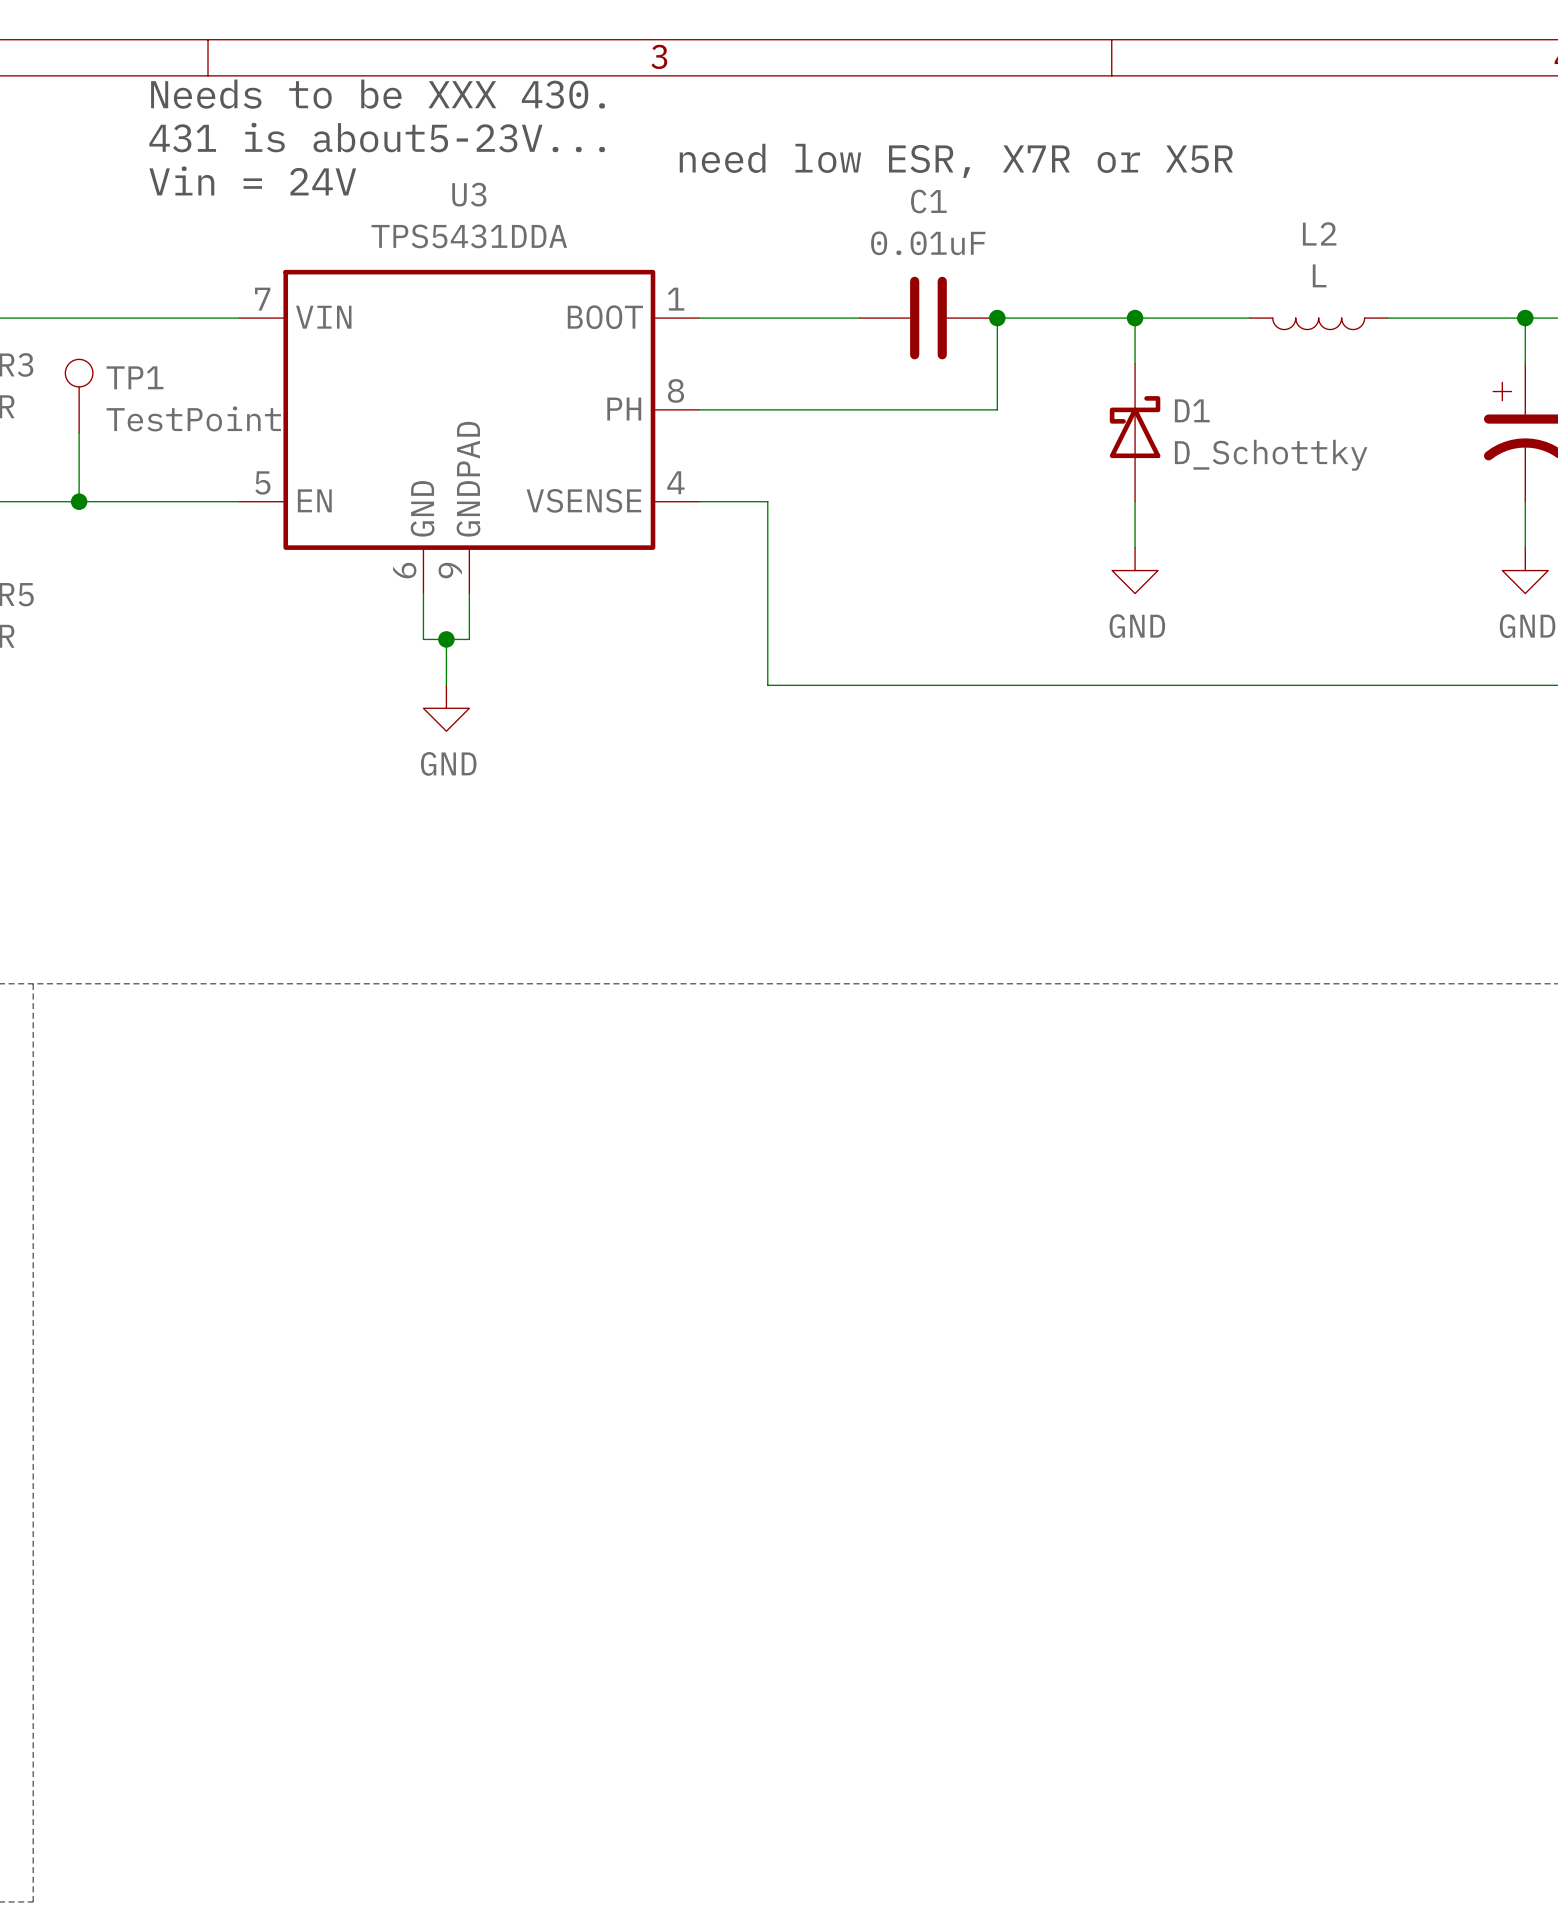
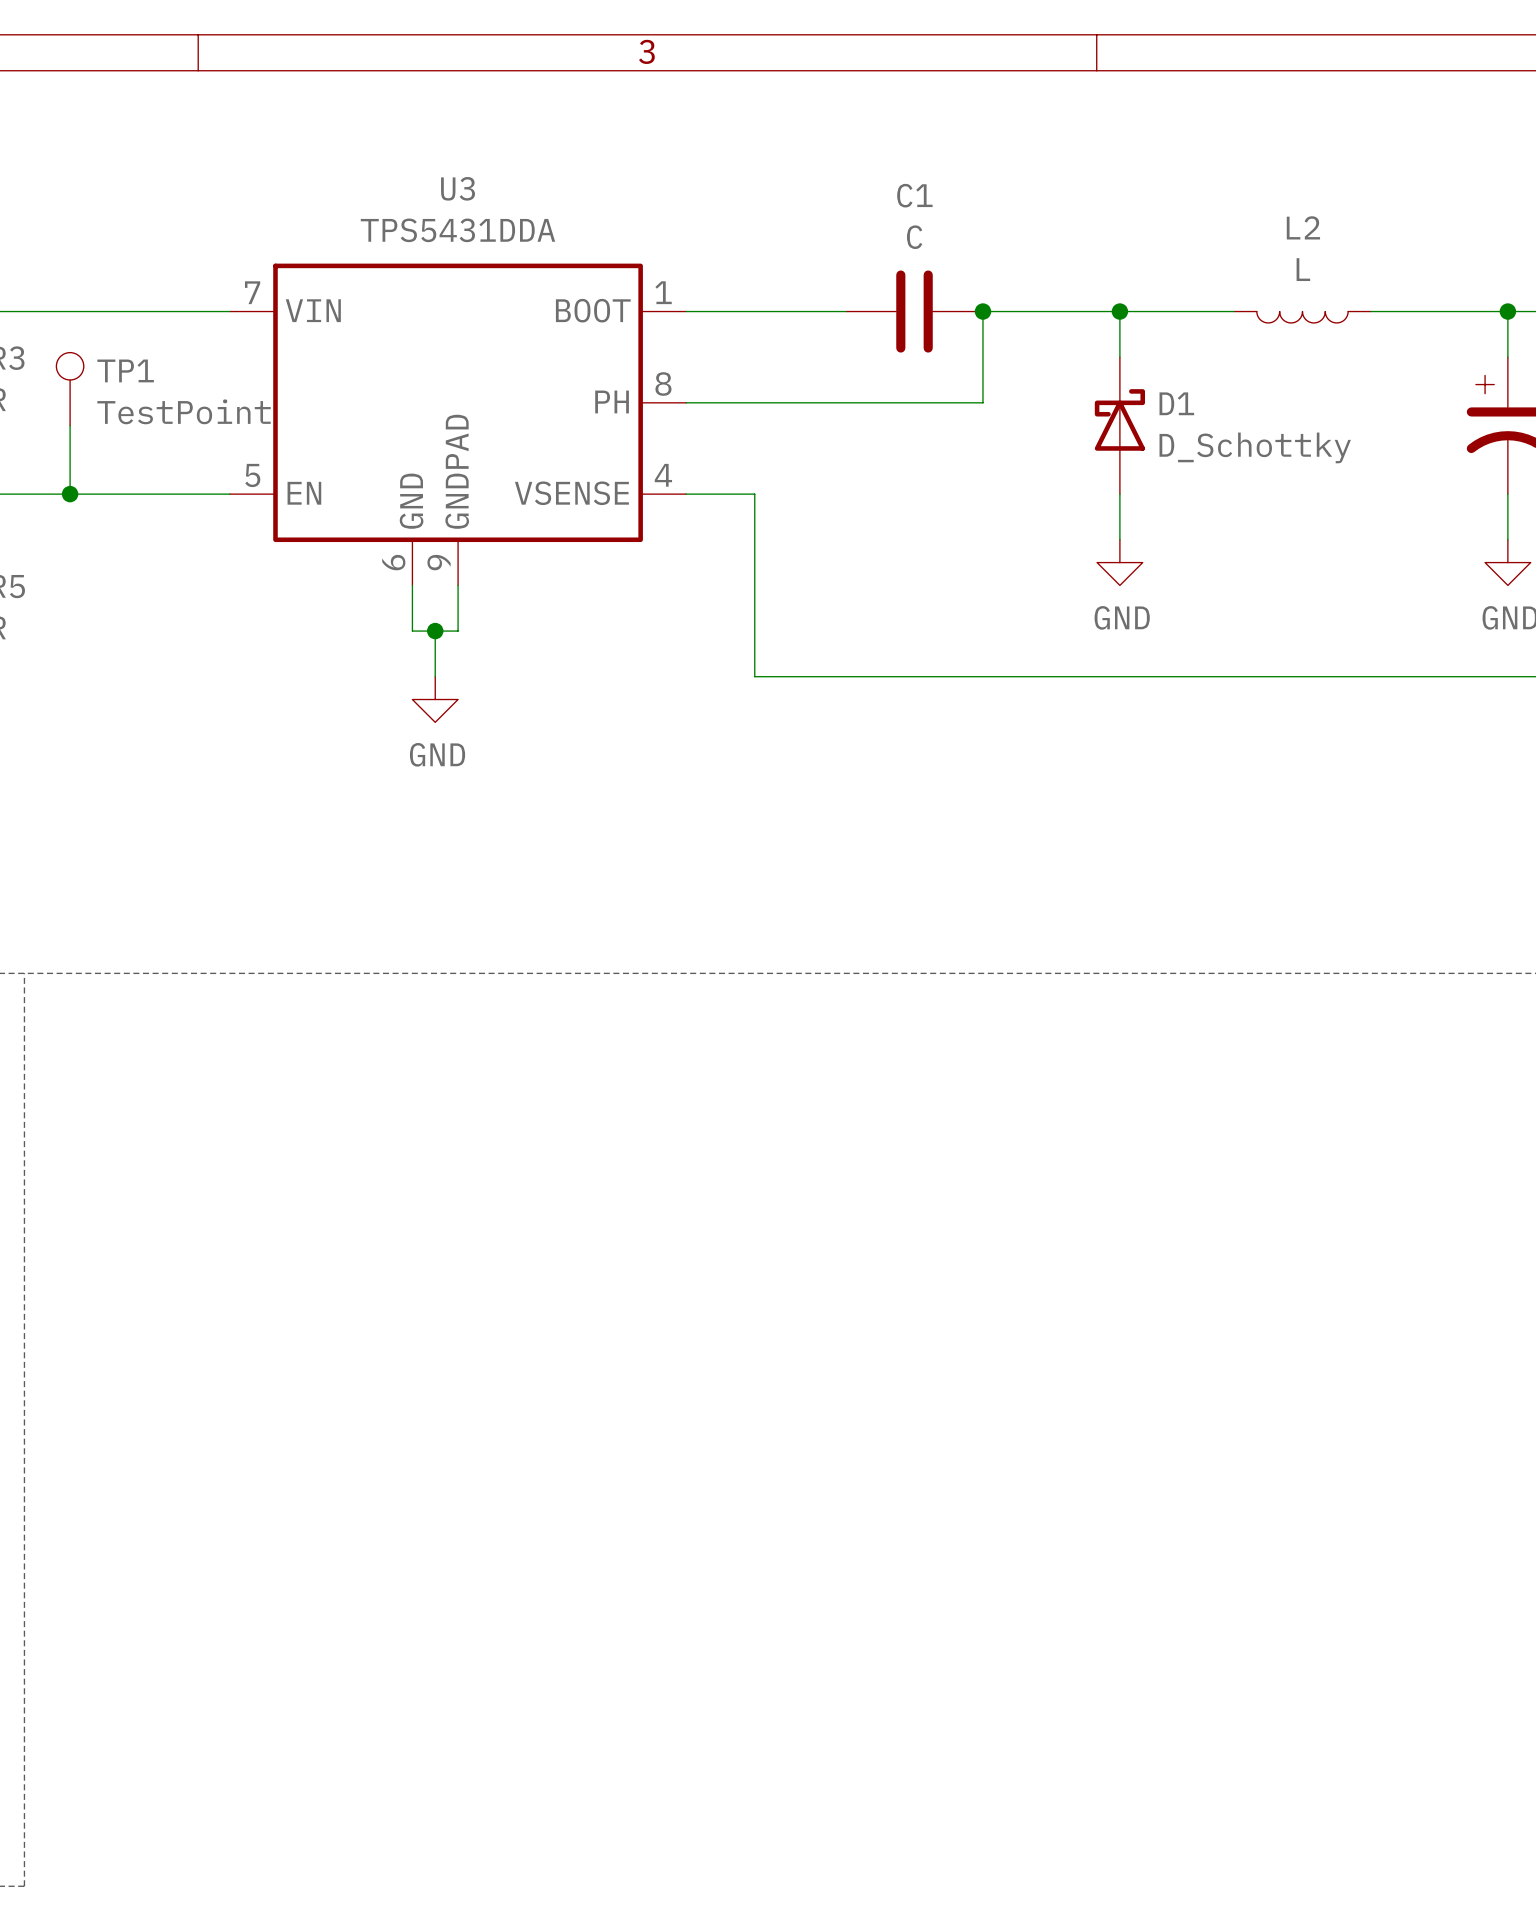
text: Needs to be XXX 430. (378, 94) -> none
text: 431 is about5-23V... (377, 137) -> none
text: need low ESR, X7R or X5R (956, 160) -> none
text: Vin = 24V (252, 180) -> none
C1 value: 0.01uF (928, 243) -> C (914, 237)

